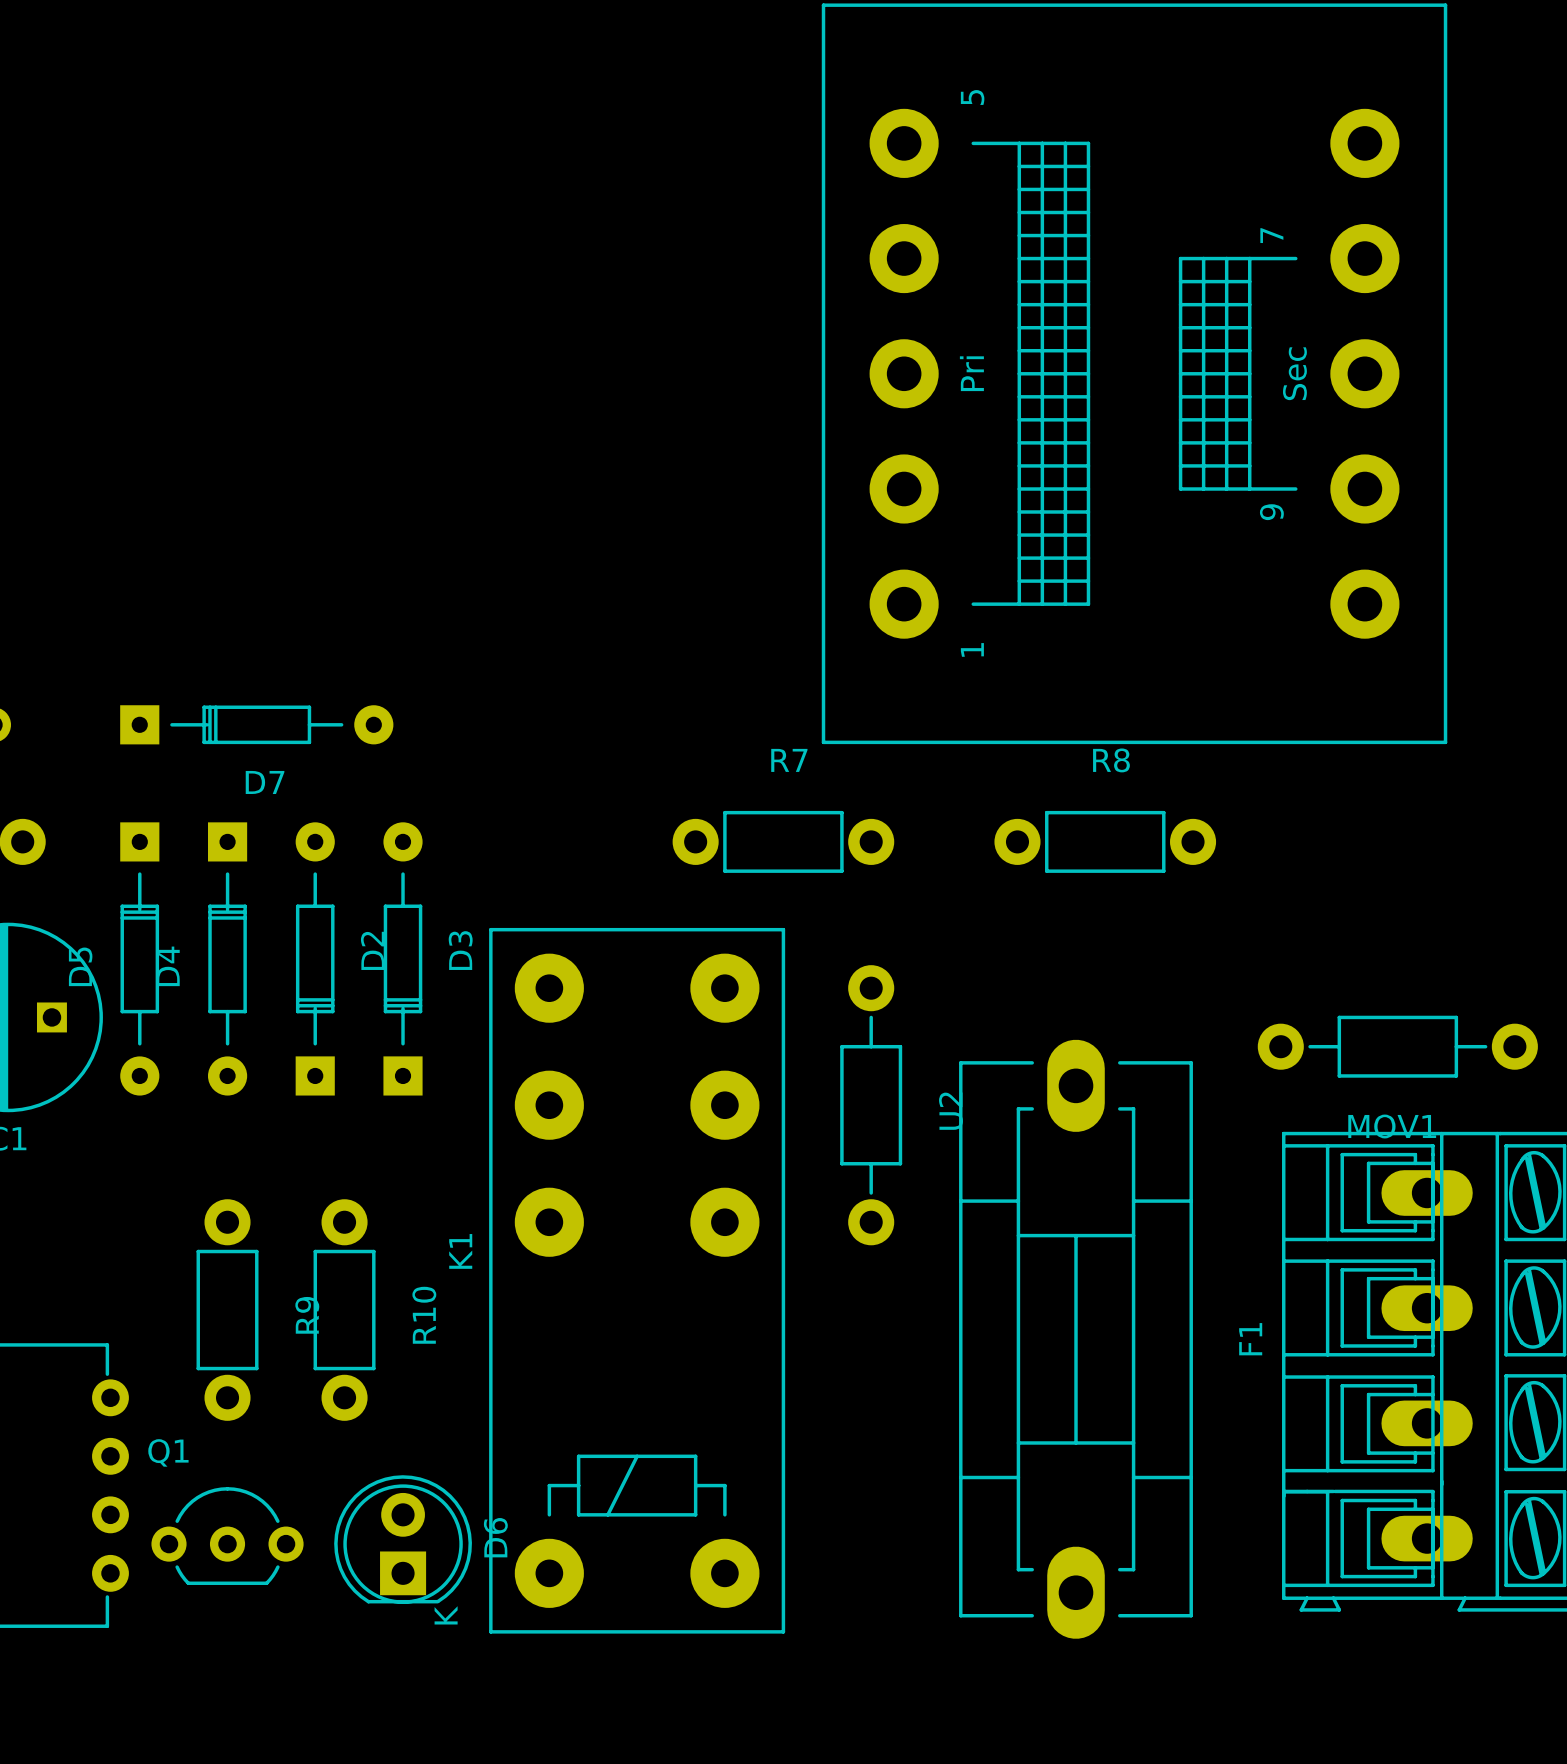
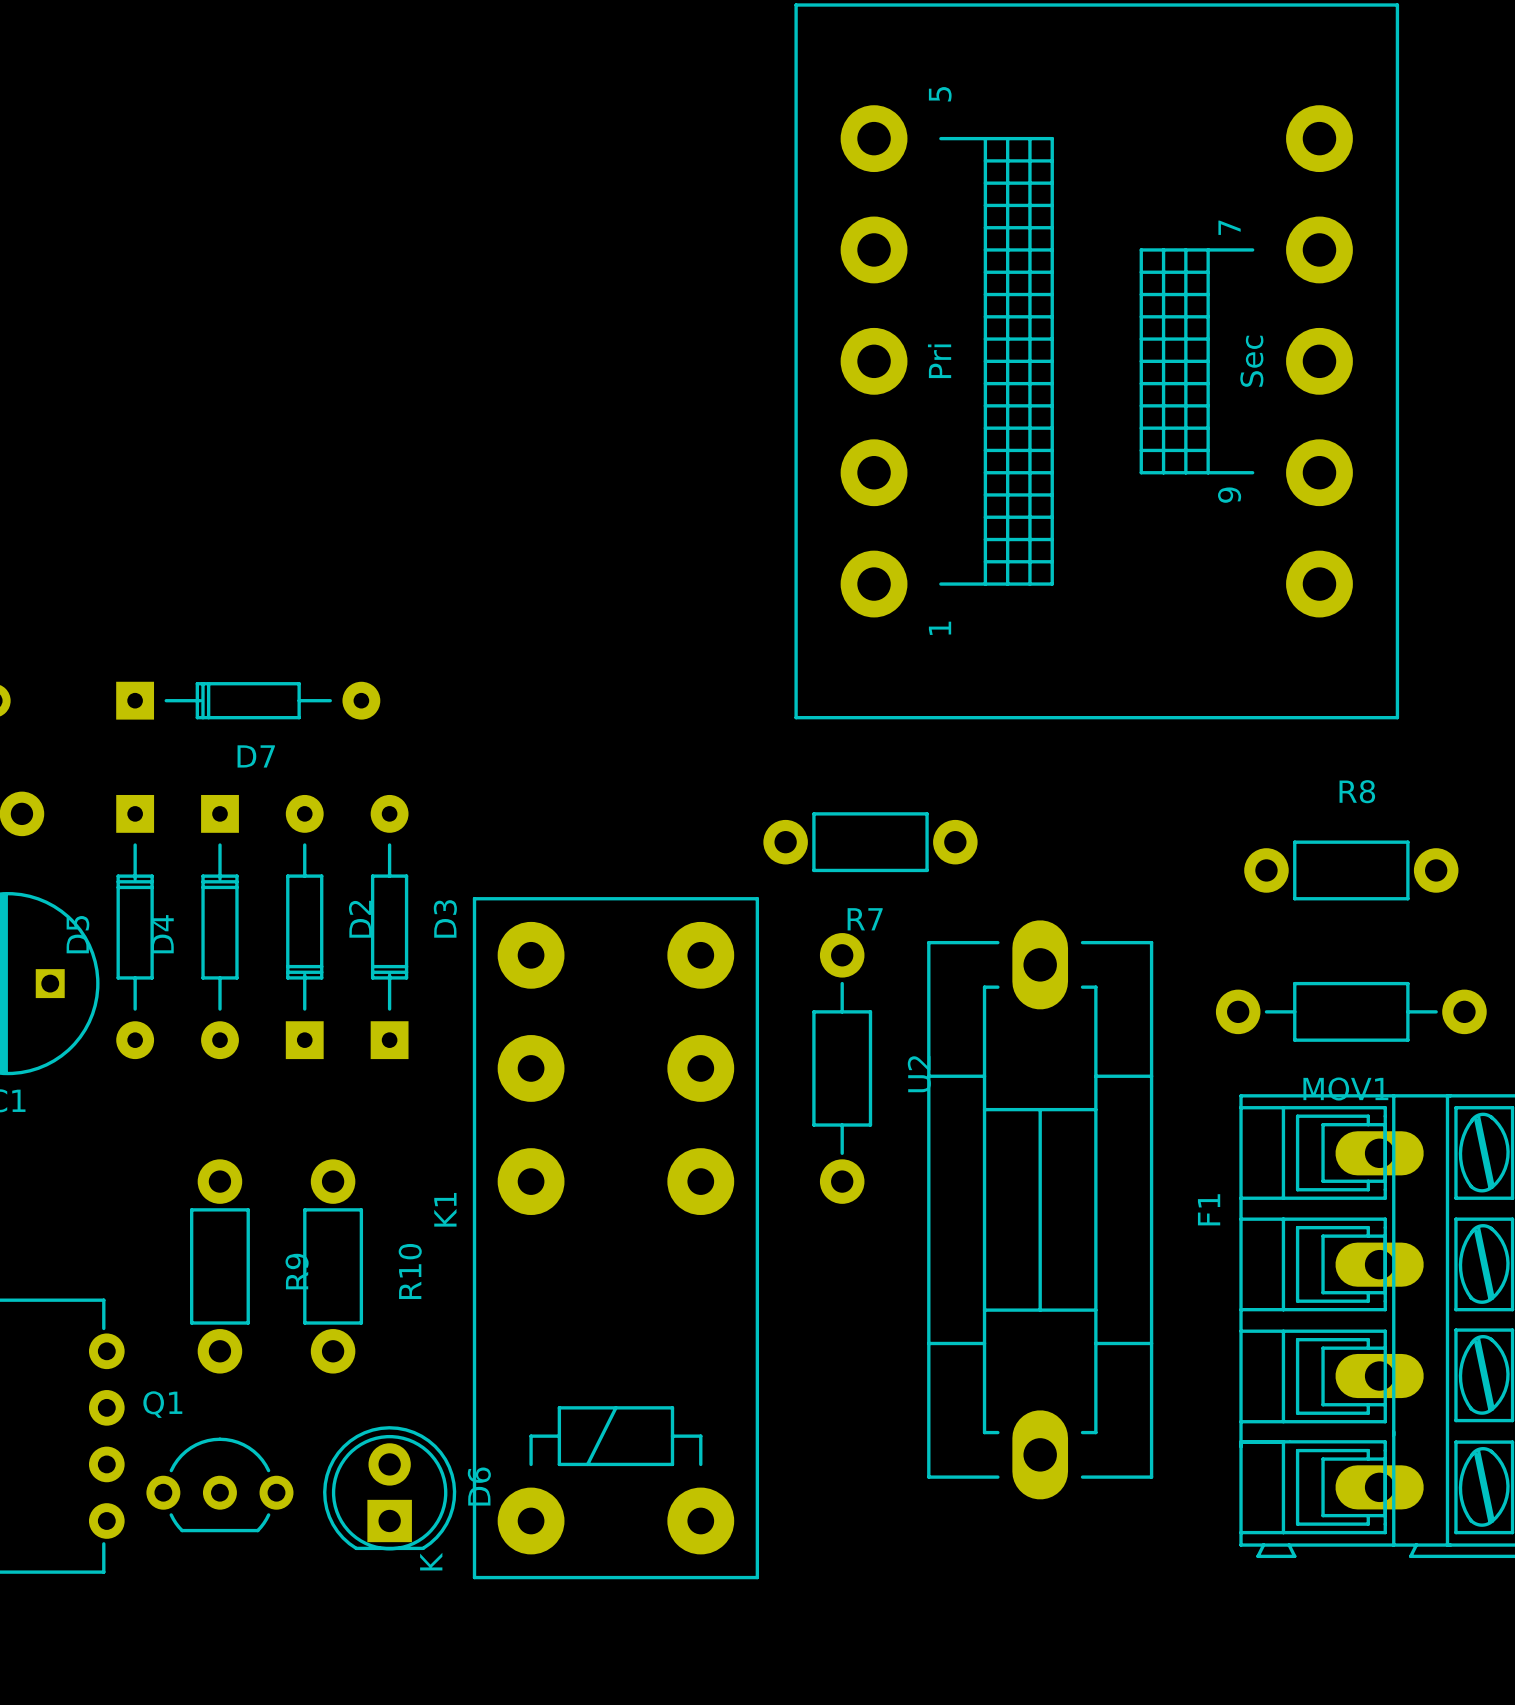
R7 name position: R7 (789, 760) -> R7 (865, 919)
R7 position: (783, 841) -> (870, 842)
R8 position: (1105, 841) -> (1351, 870)
F1 position: (1076, 1339) -> (1040, 1209)

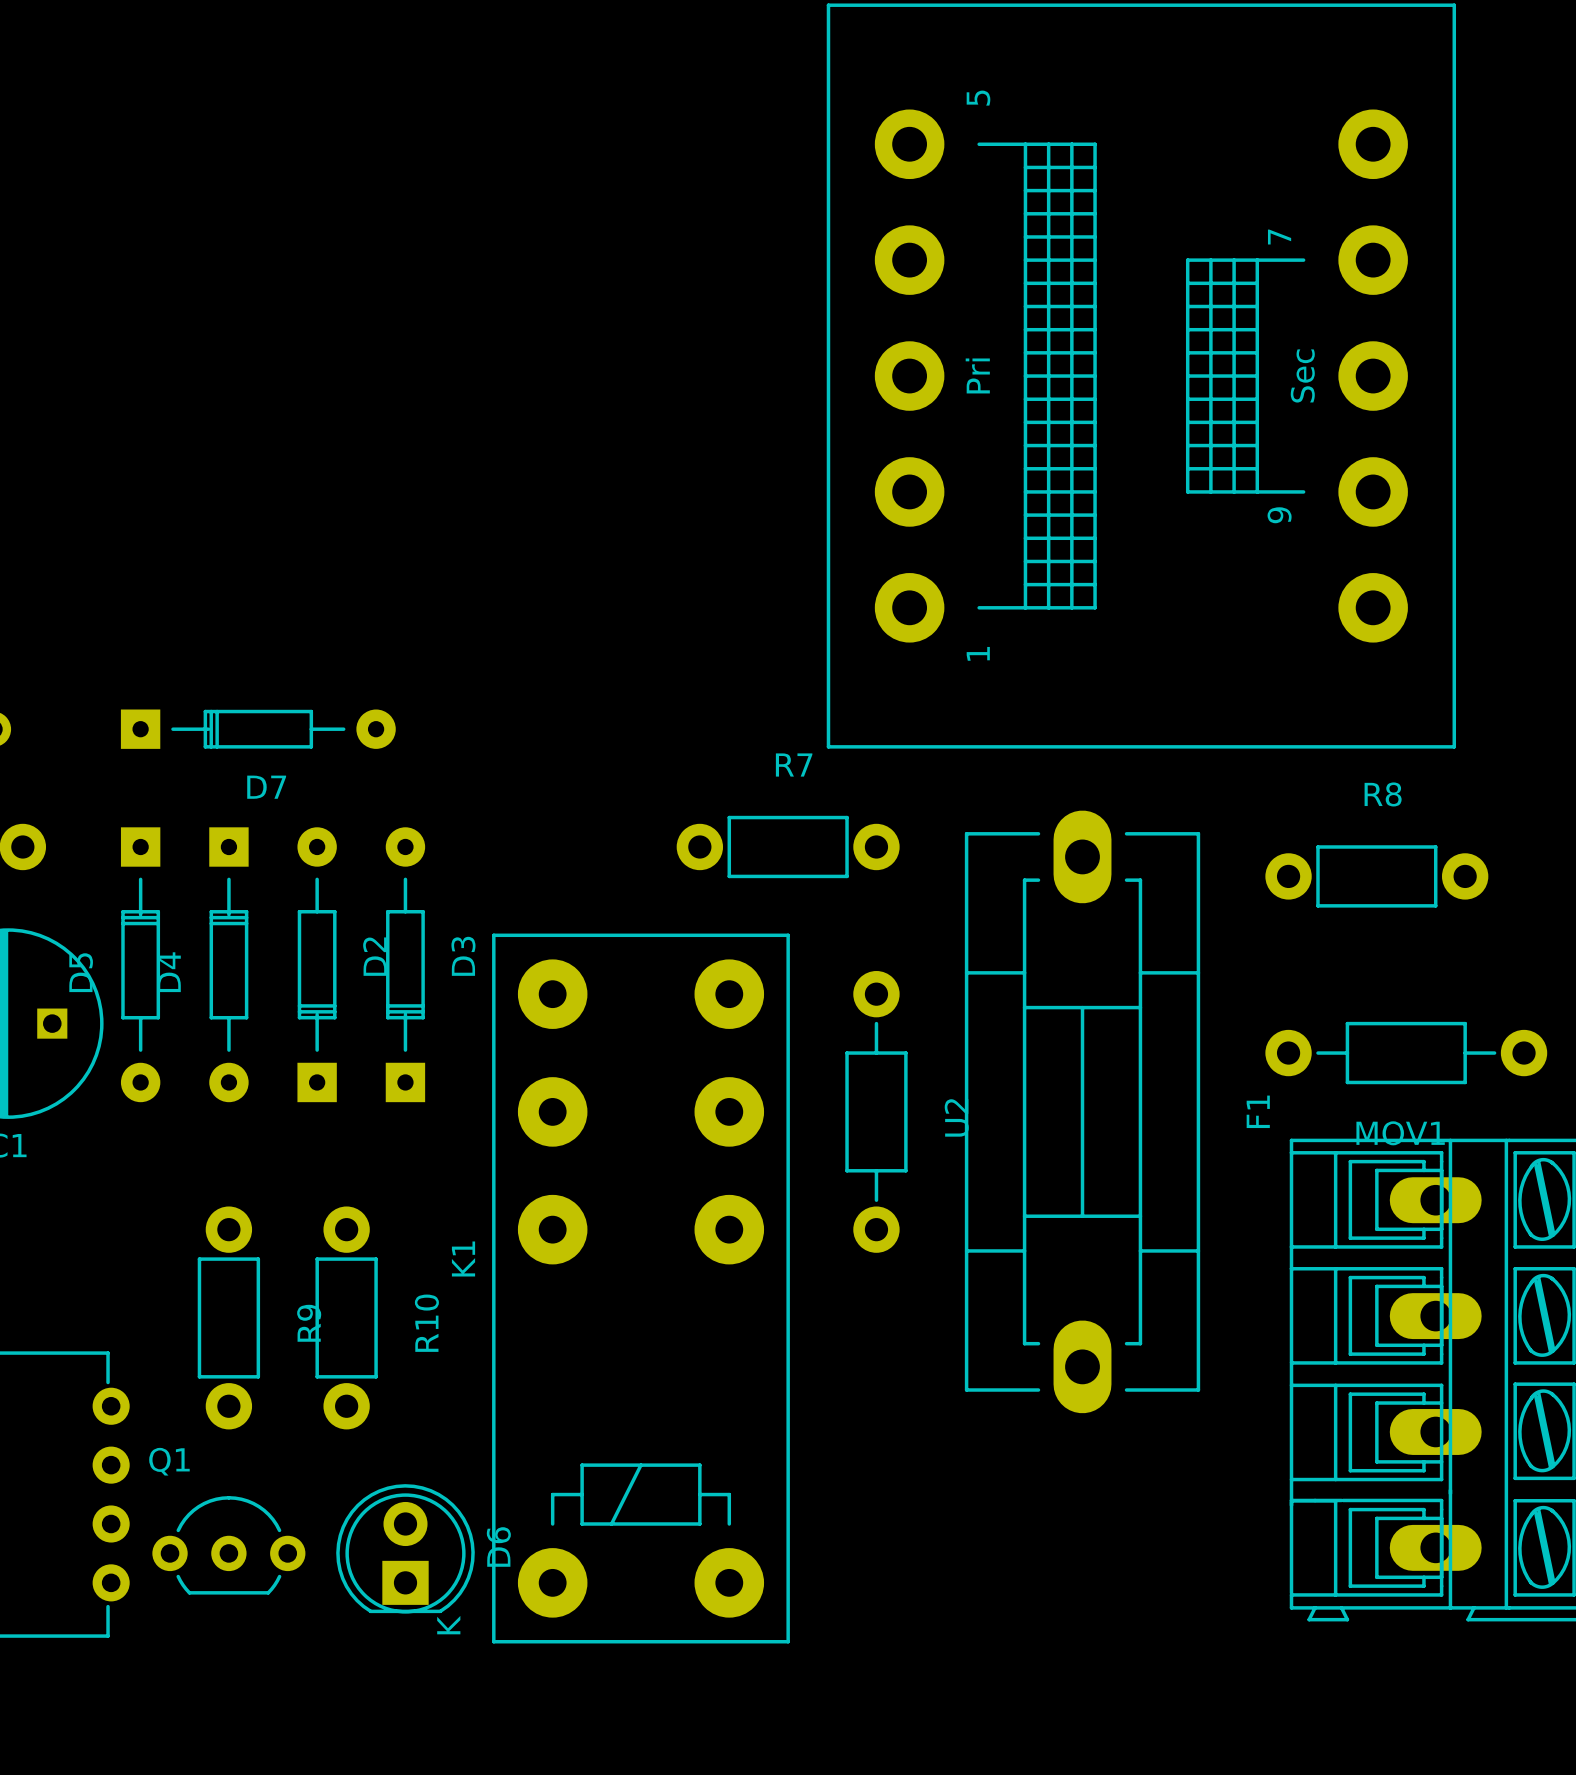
R7 position: (870, 842) -> (788, 846)
R8 position: (1351, 870) -> (1376, 876)
R7 name position: R7 (865, 919) -> R7 (794, 765)
F1 position: (1040, 1209) -> (1082, 1111)

